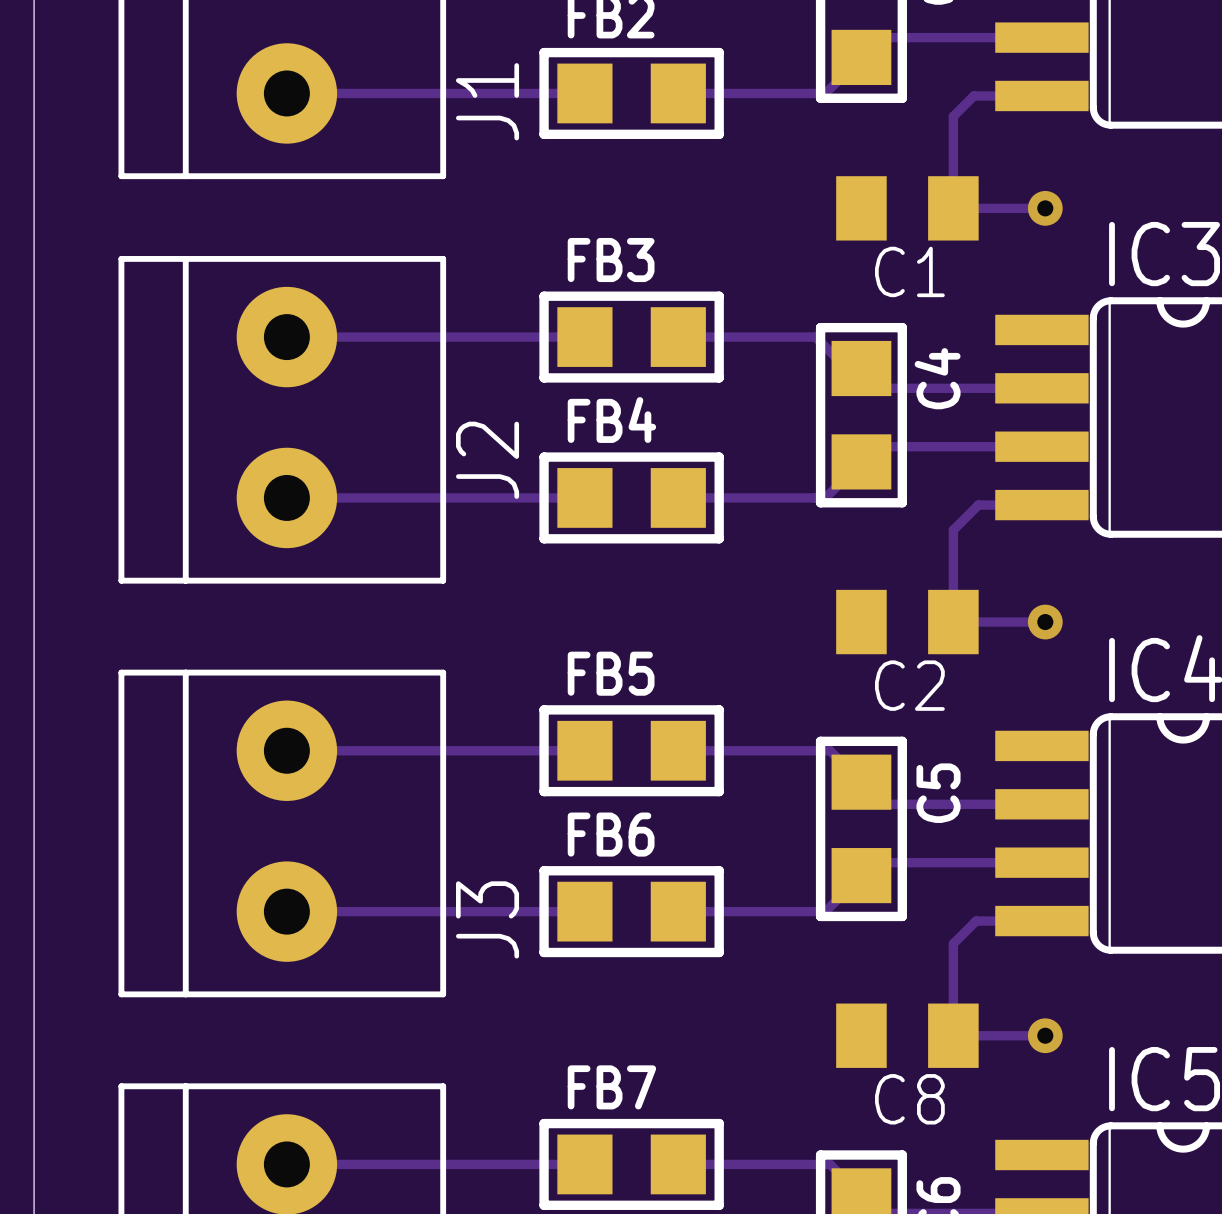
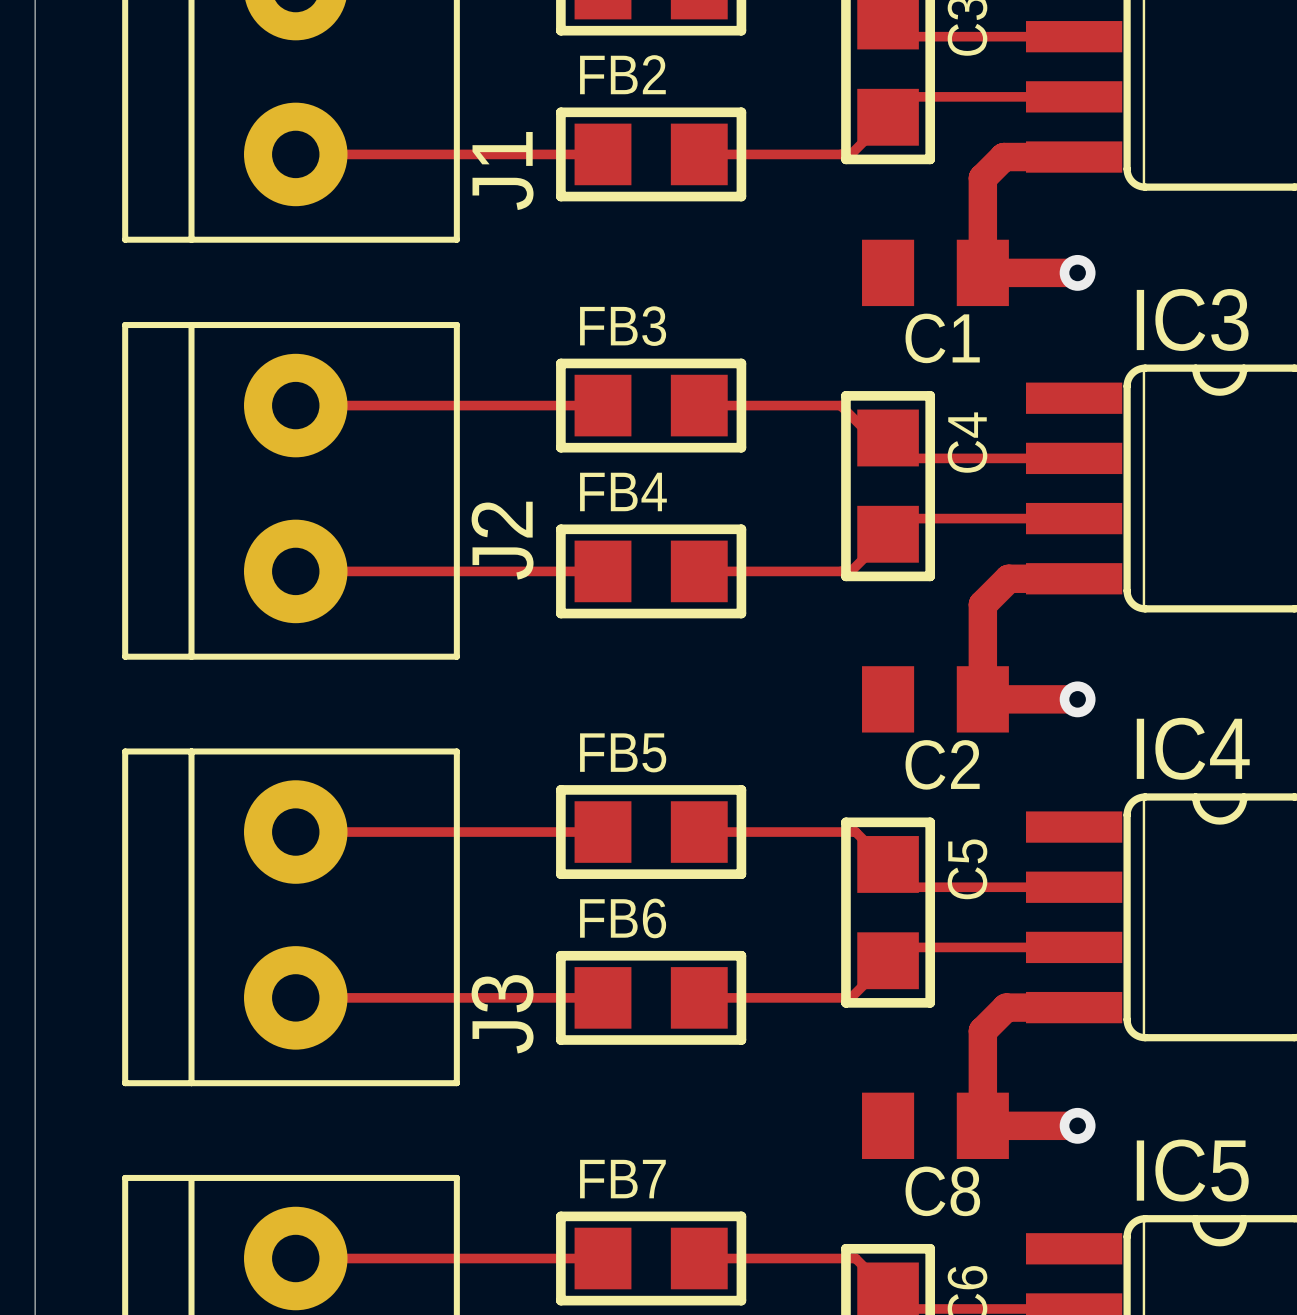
track width: thin (1041, 95) (973, 95) (953, 116) (953, 208) (1045, 208) -> thick (1074, 157) (1003, 157) (982, 178) (982, 272) (1077, 272)
track width: thin (1041, 505) (978, 505) (953, 530) (953, 622) (1045, 622) -> thick (1074, 578) (1008, 578) (982, 604) (982, 699) (1077, 699)
track width: thin (1041, 921) (976, 921) (953, 943) (953, 1035) (1045, 1035) -> thick (1074, 1007) (1006, 1007) (982, 1031) (982, 1125) (1077, 1125)

